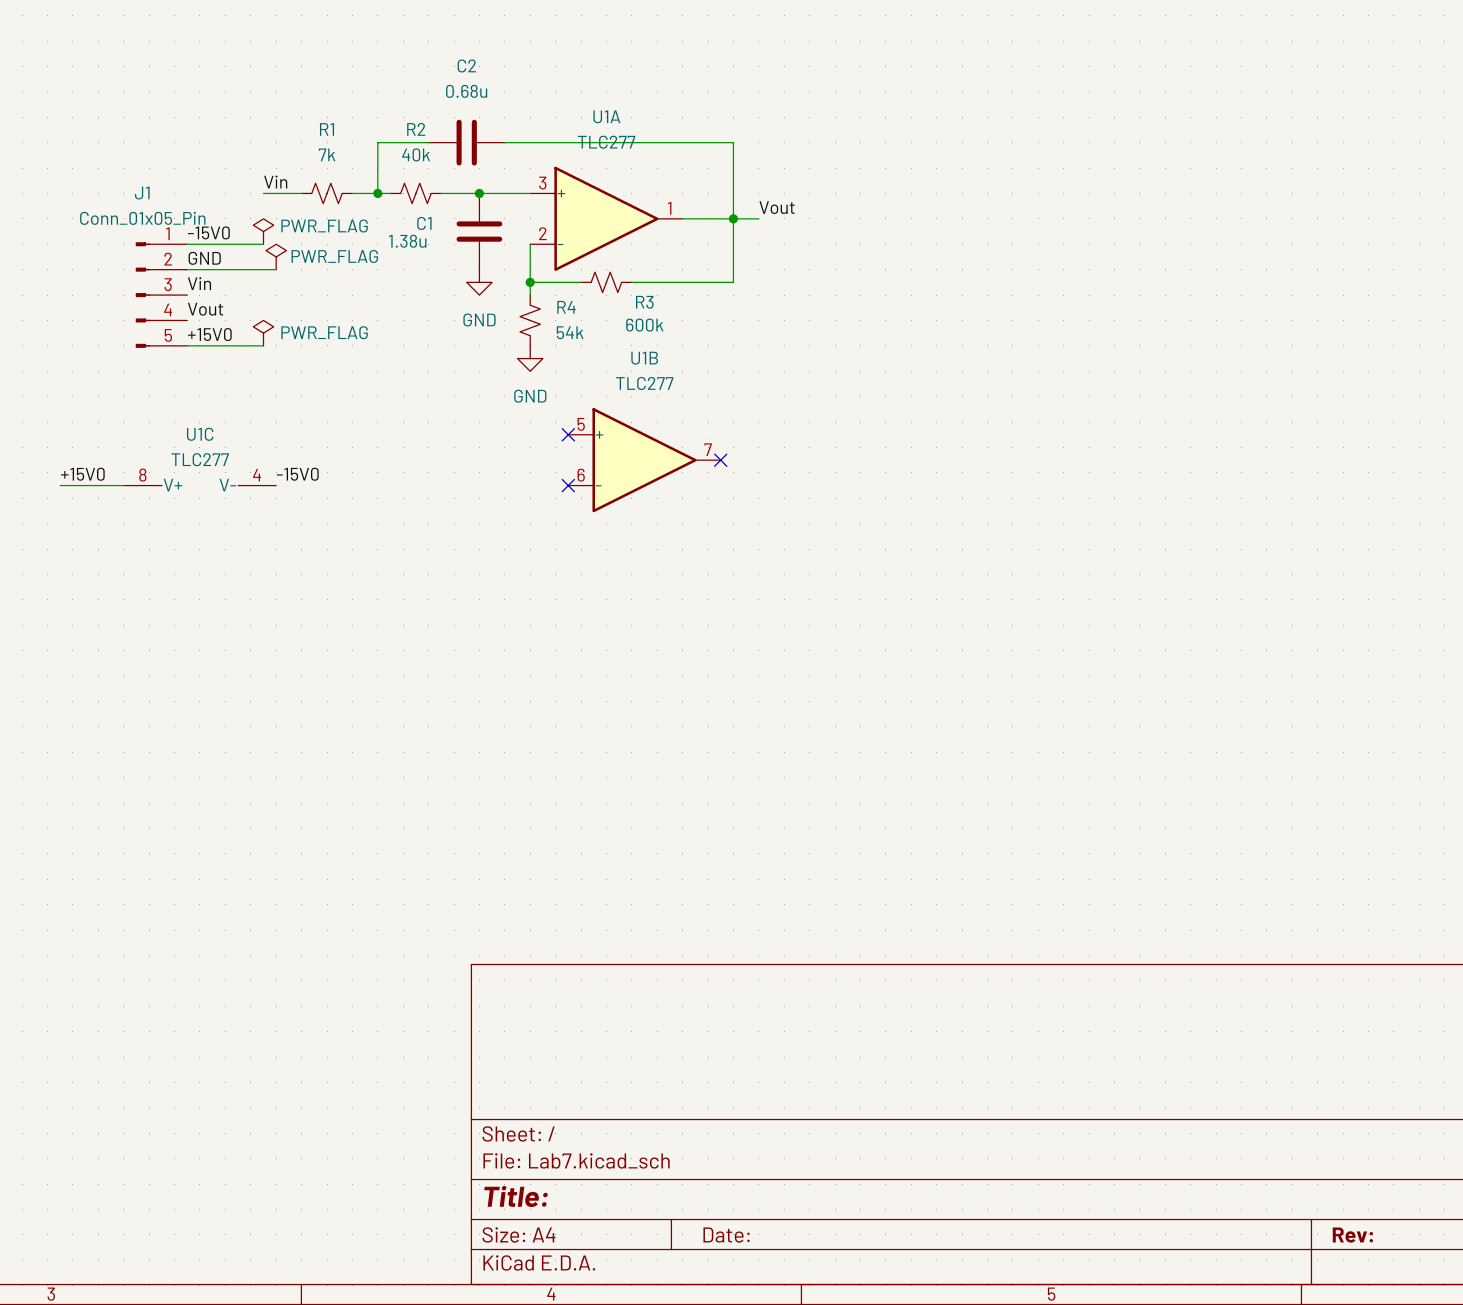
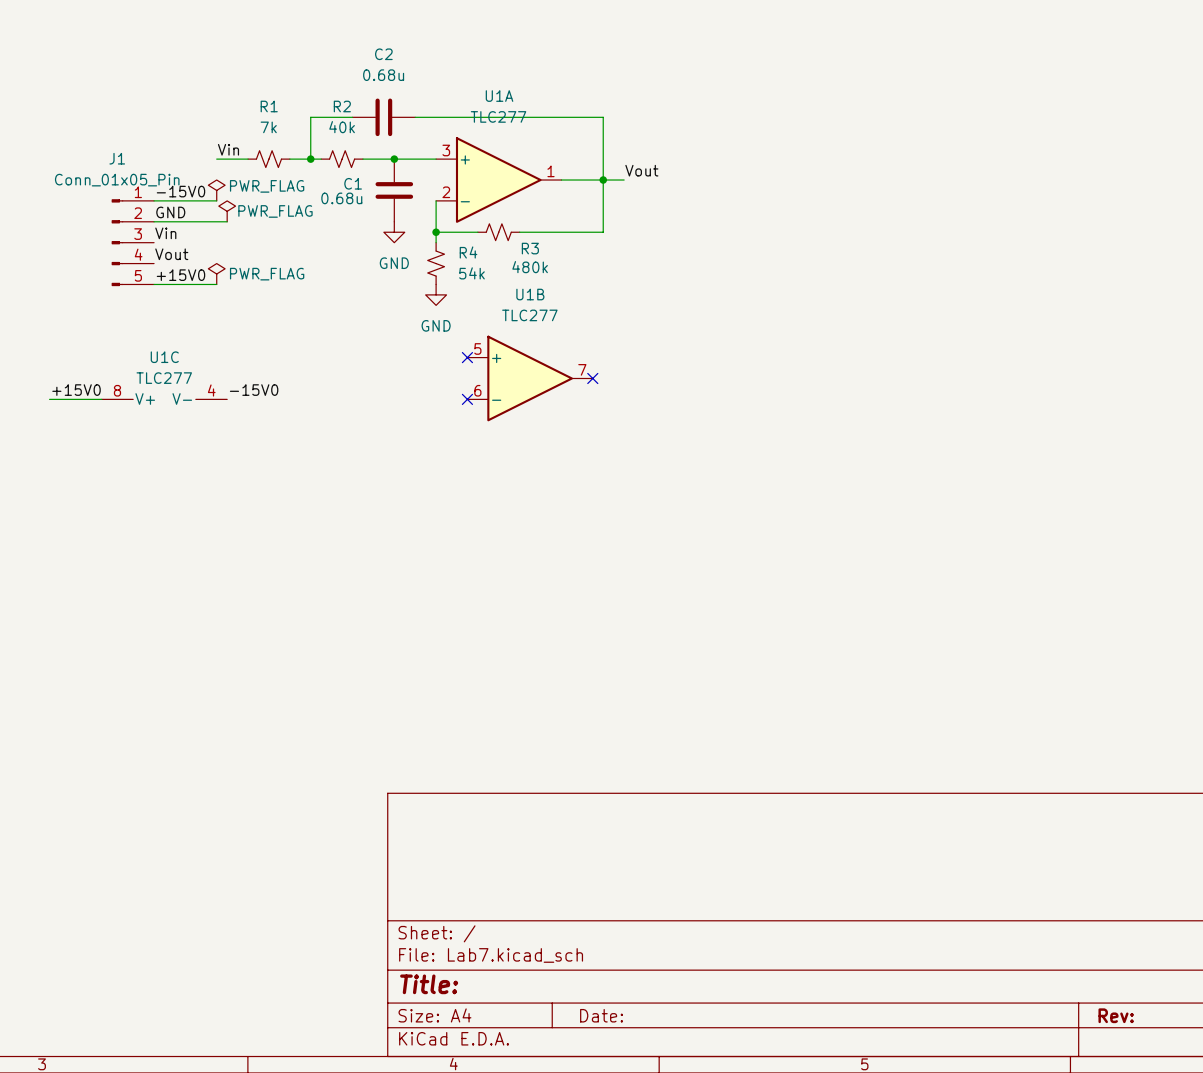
C1 value: 1.38u (407, 241) -> 0.68u (341, 198)
R3 value: 600k (644, 325) -> 480k (530, 267)

